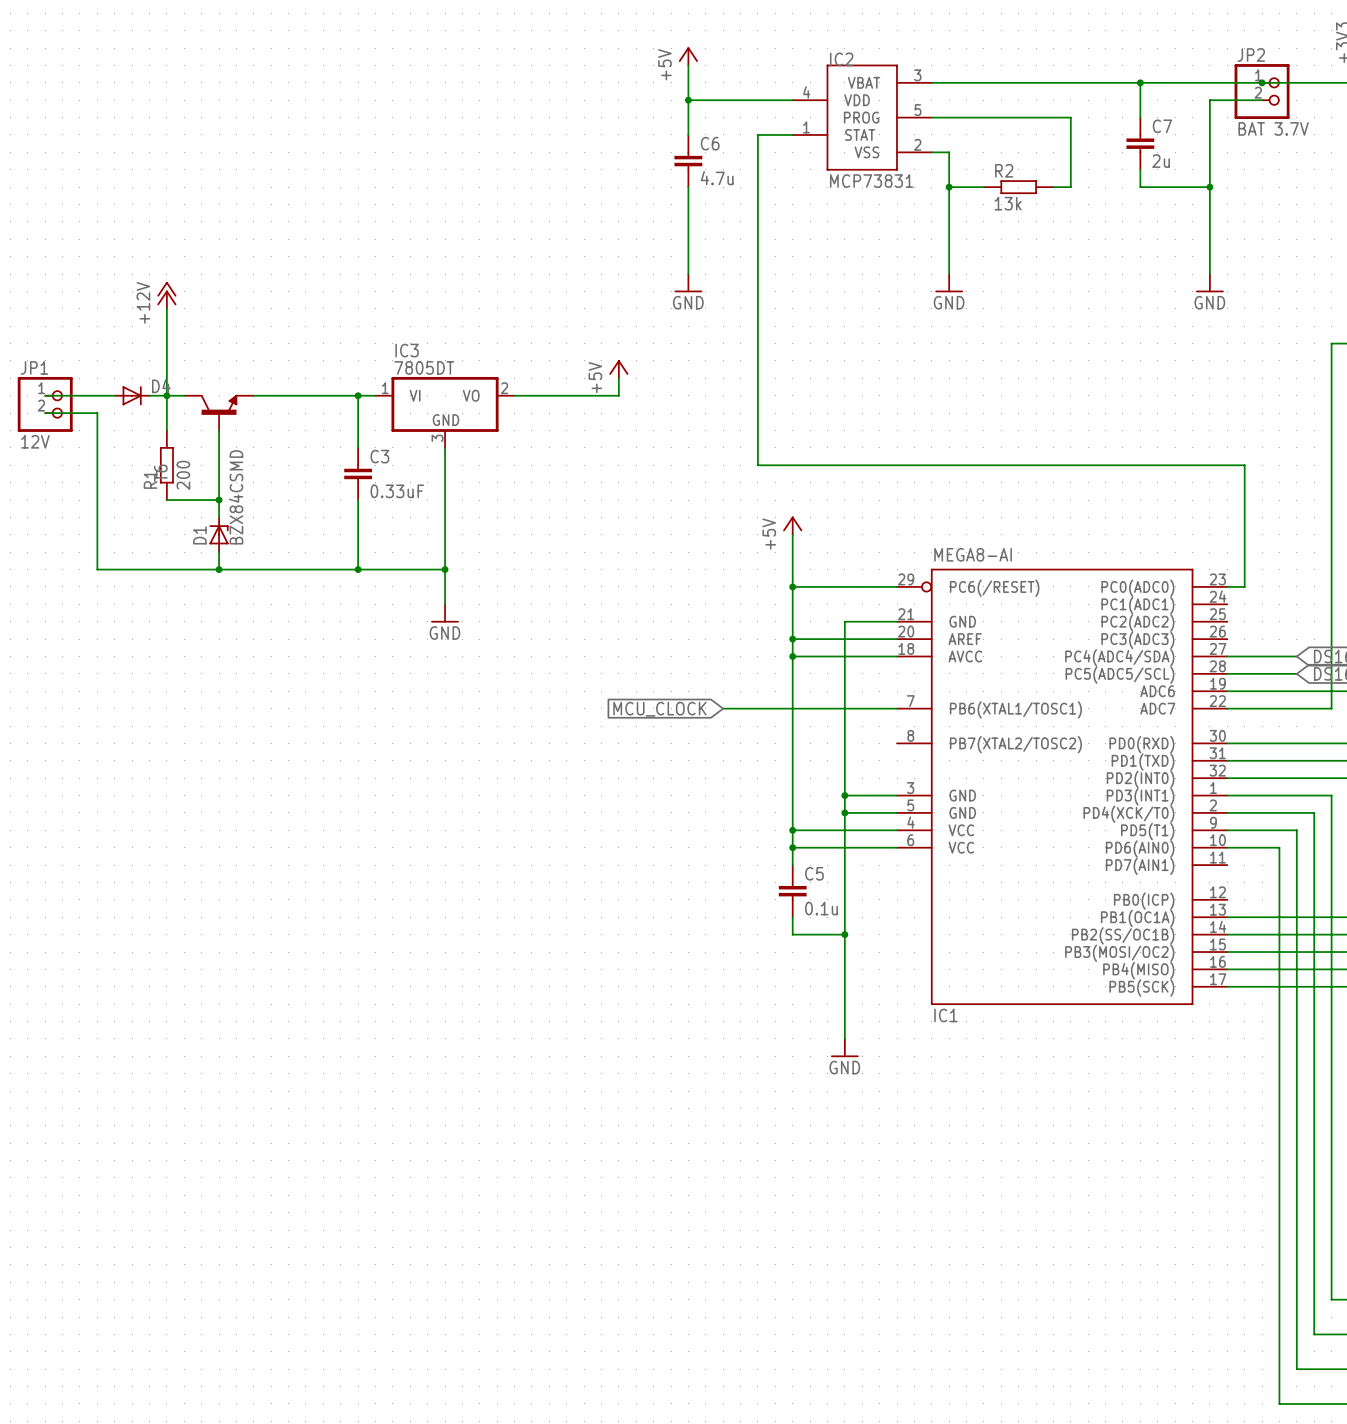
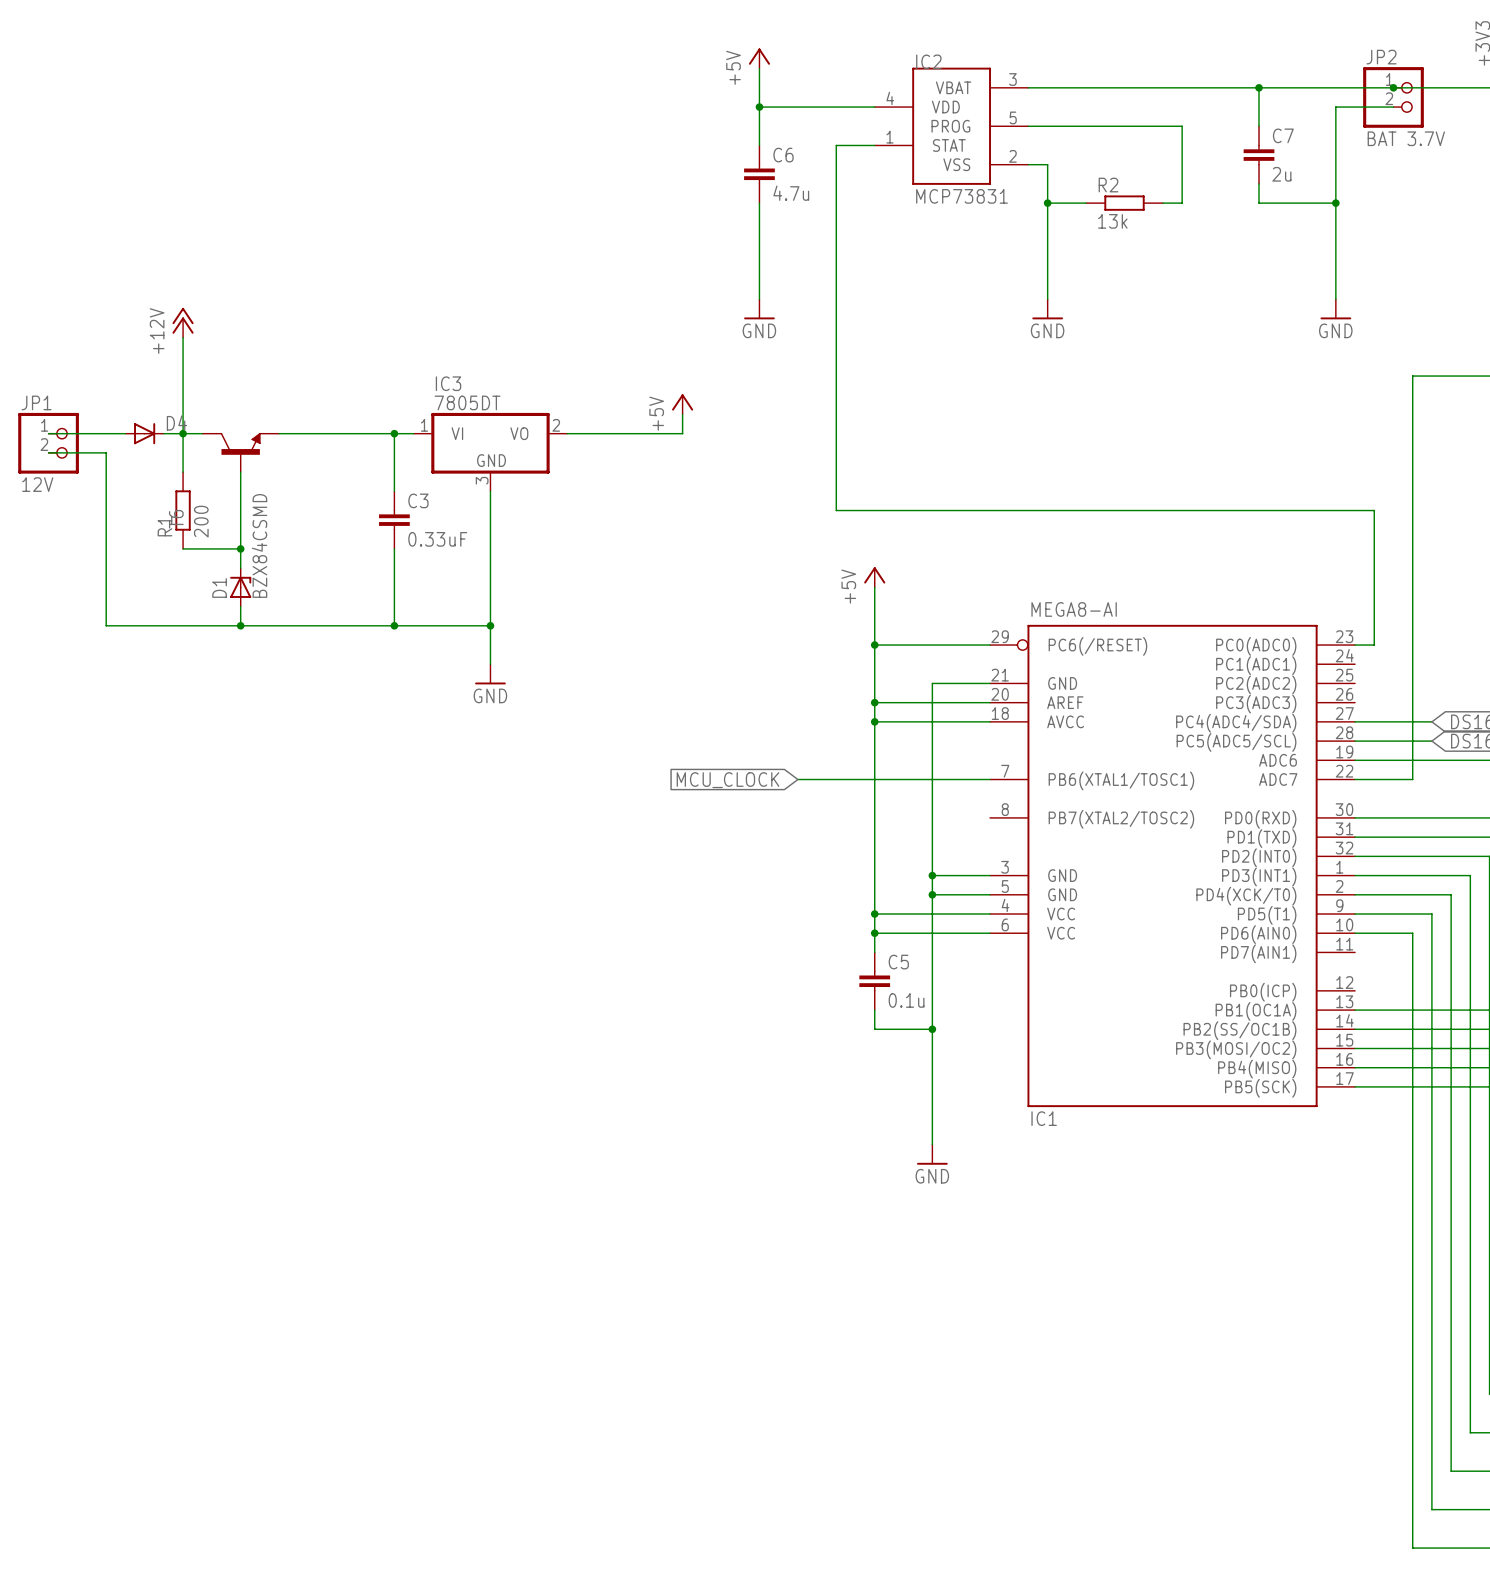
wire: (1331, 343) (1331, 708) (1279, 708) -> (1470, 376) (1412, 376) (1412, 779)

